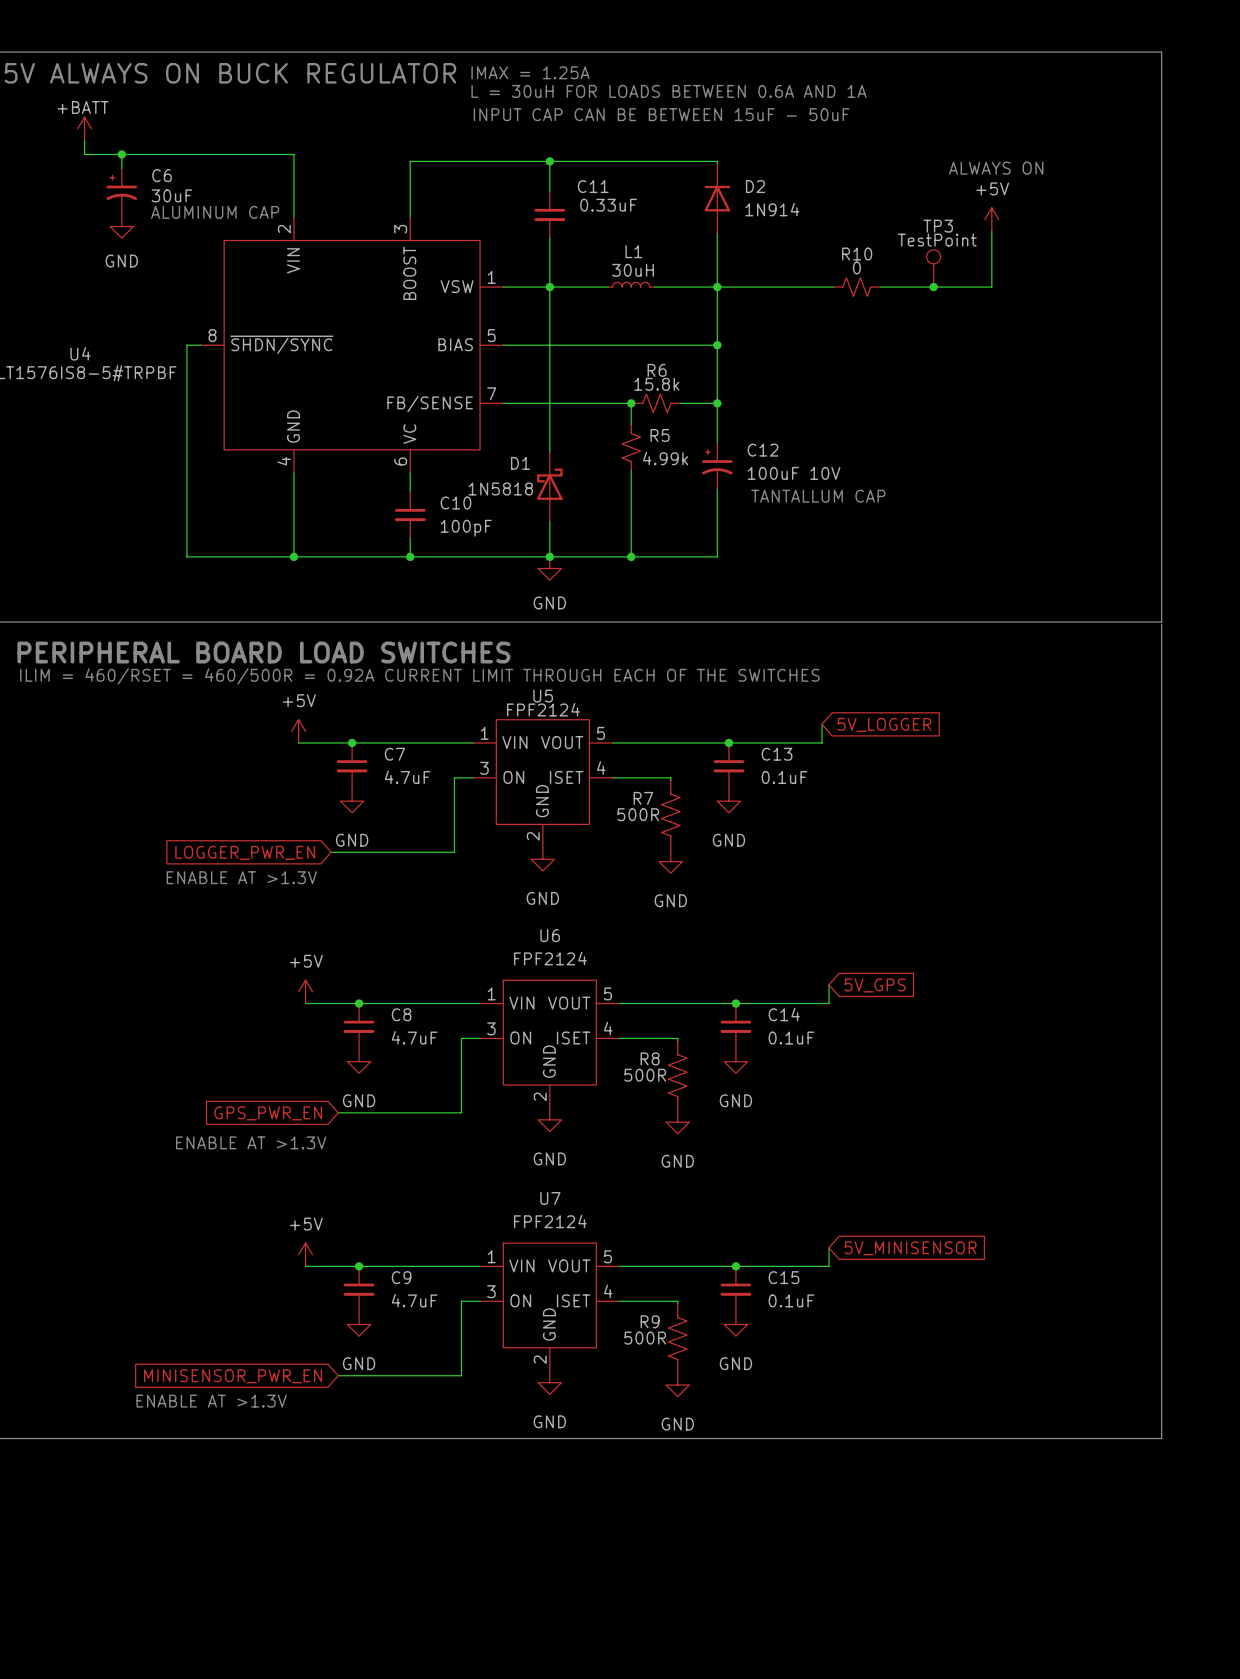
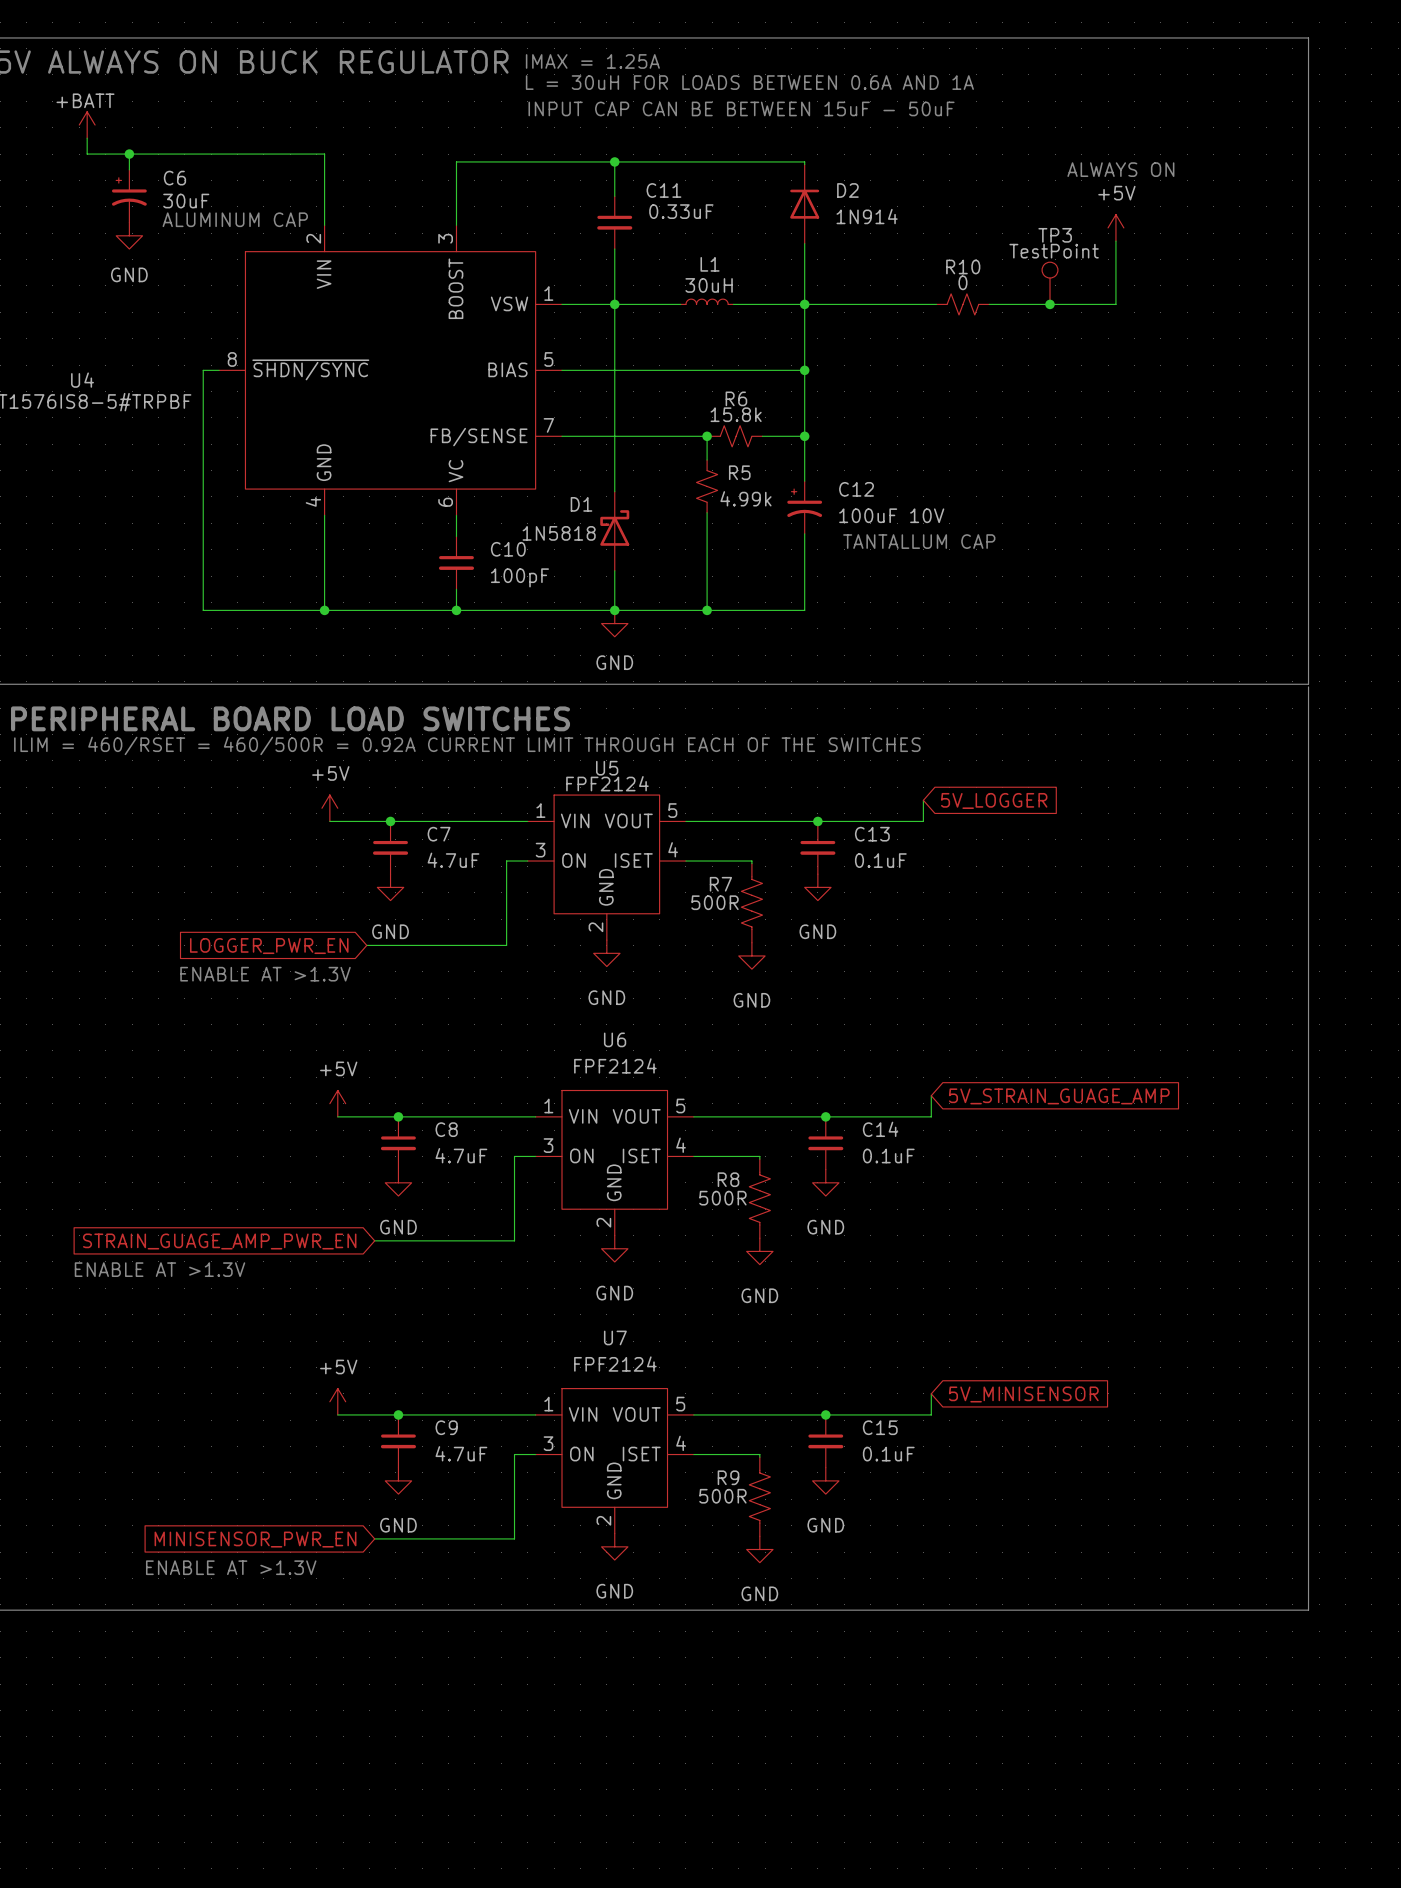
global label: 5V_GPS (875, 985) -> 5V_STRAIN_GUAGE_AMP (1059, 1096)
global label: GPS_PWR_EN (268, 1113) -> STRAIN_GUAGE_AMP_PWR_EN (219, 1241)
text position: ENABLE AT >1.3V (251, 1142) -> ENABLE AT >1.3V (160, 1269)

